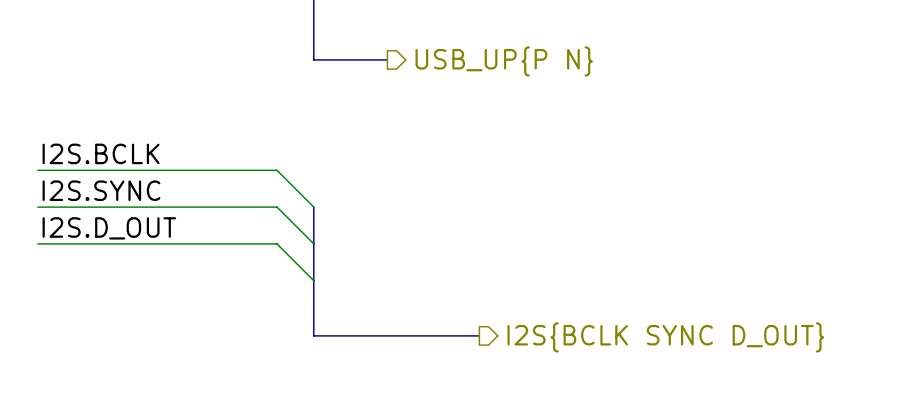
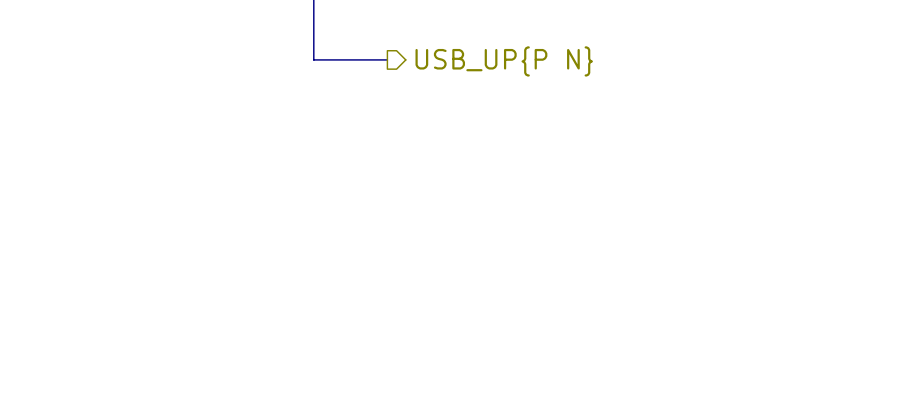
label: I2S.BCLK (101, 153) -> none
wire: (37, 170) (277, 170) (313, 207) -> none
label: I2S.SYNC (101, 190) -> none
wire: (37, 207) (277, 207) (313, 243) -> none
bus: (313, 207) (313, 335) (479, 335) -> none
label: I2S.D_OUT (109, 228) -> none
wire: (37, 243) (277, 243) (313, 280) -> none
hierarchical label: I2S{BCLK SYNC D_OUT} (665, 337) -> none

